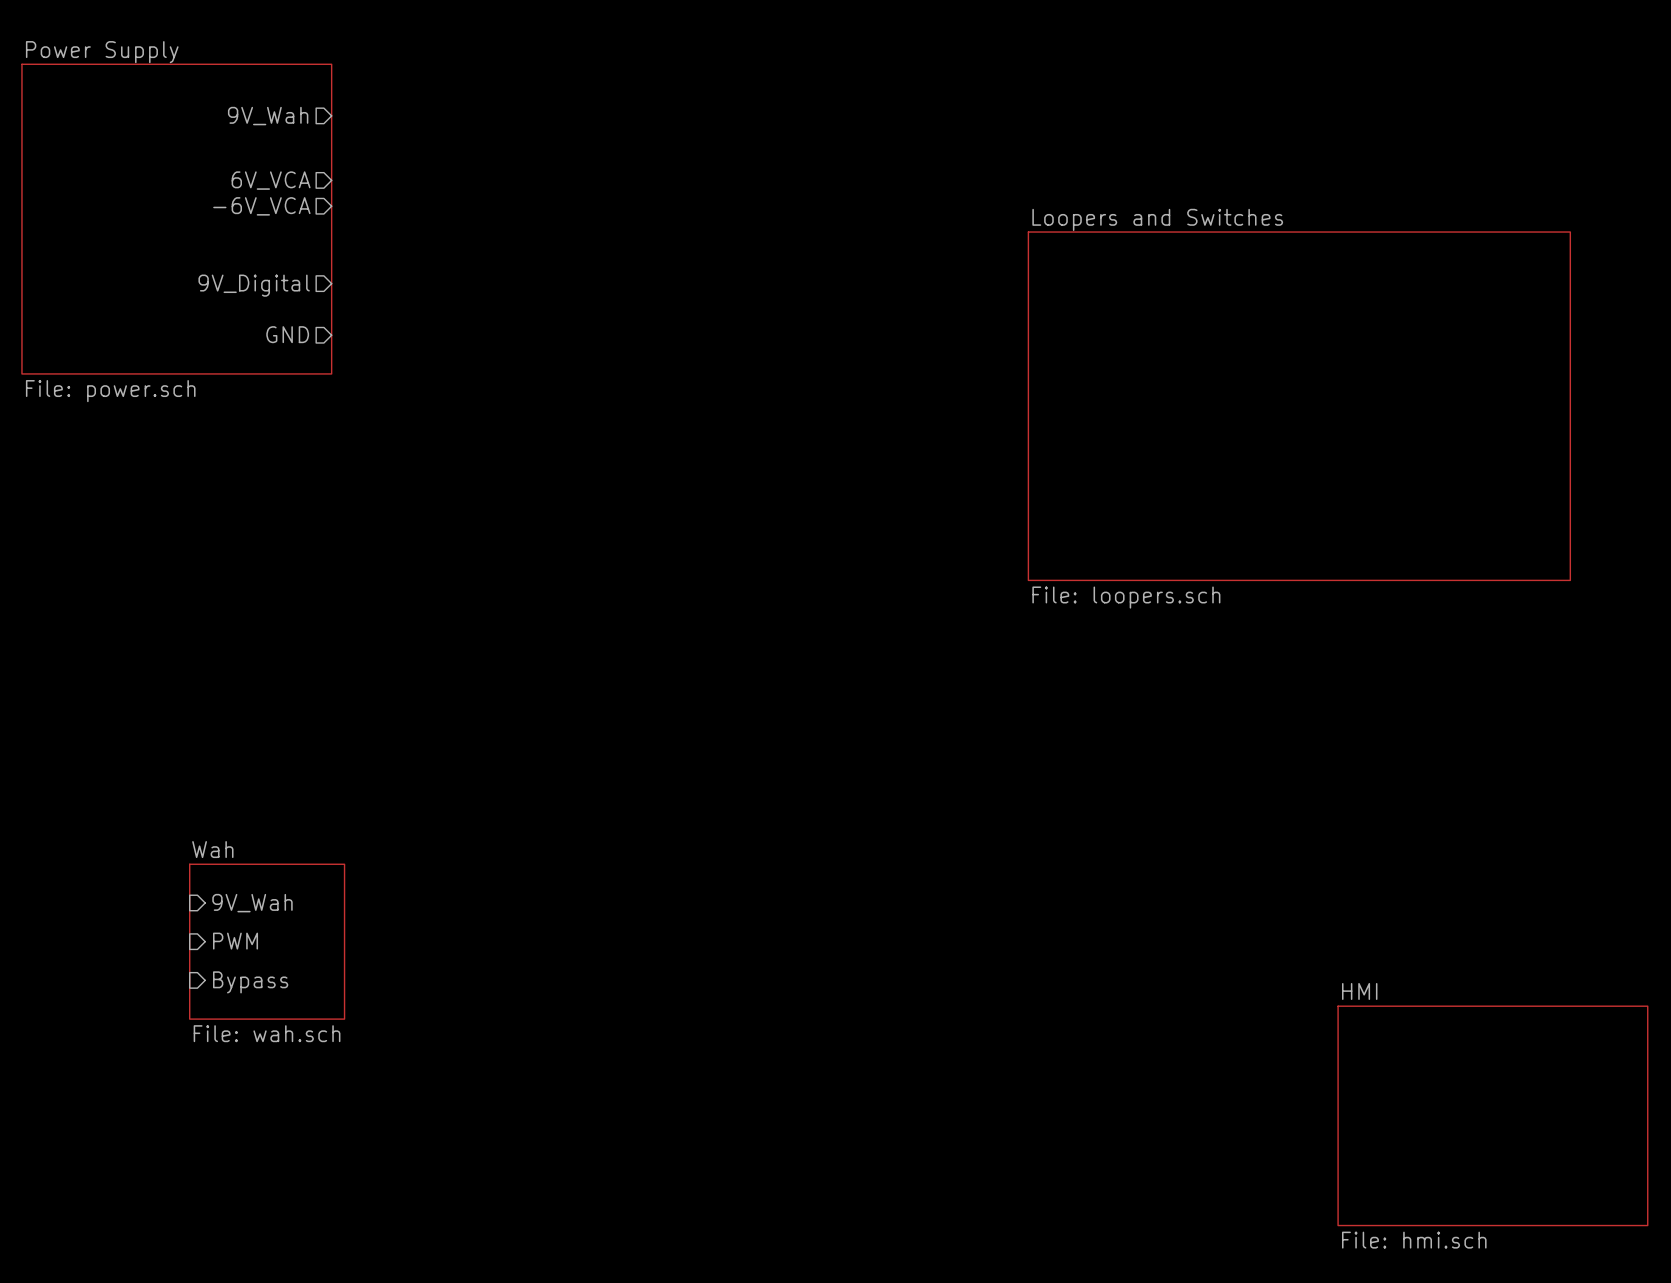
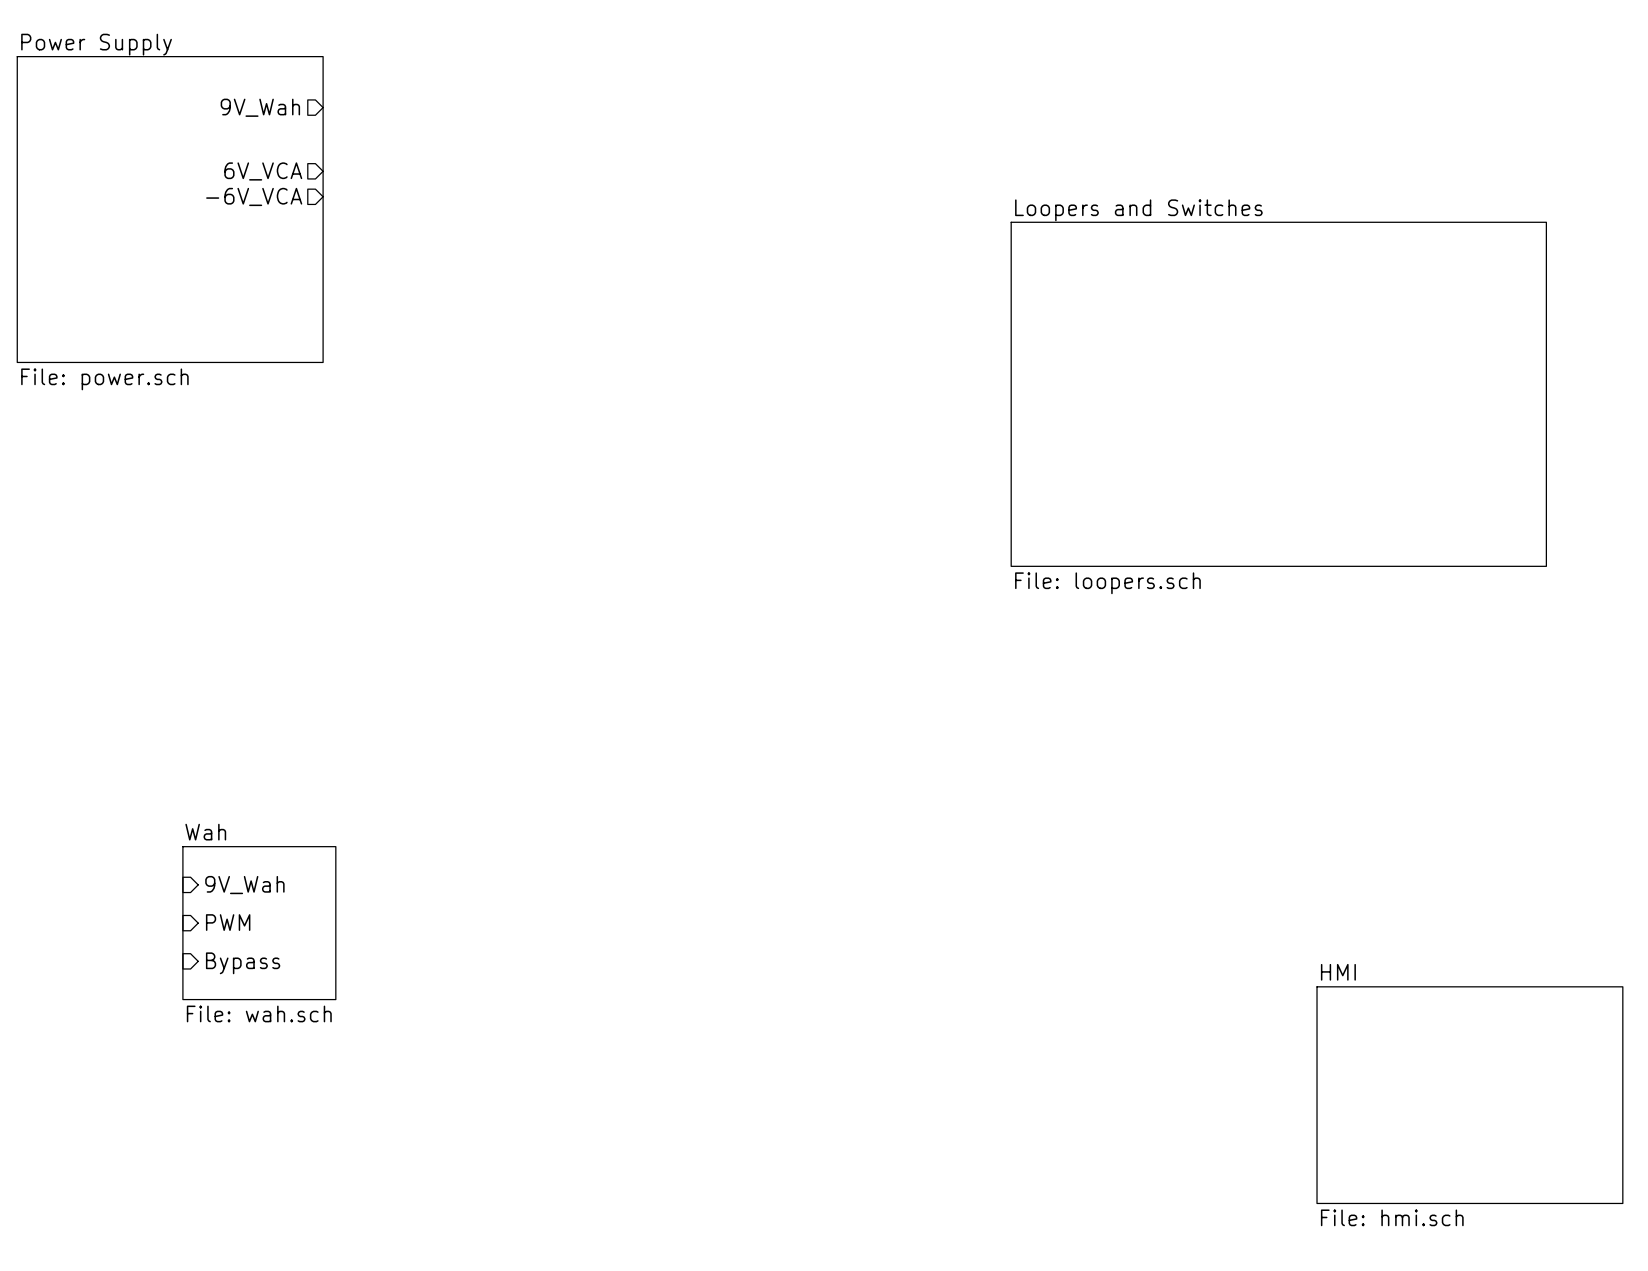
sheet pin: 9V_Digital (254, 285) -> none
sheet pin: GND (287, 334) -> none

